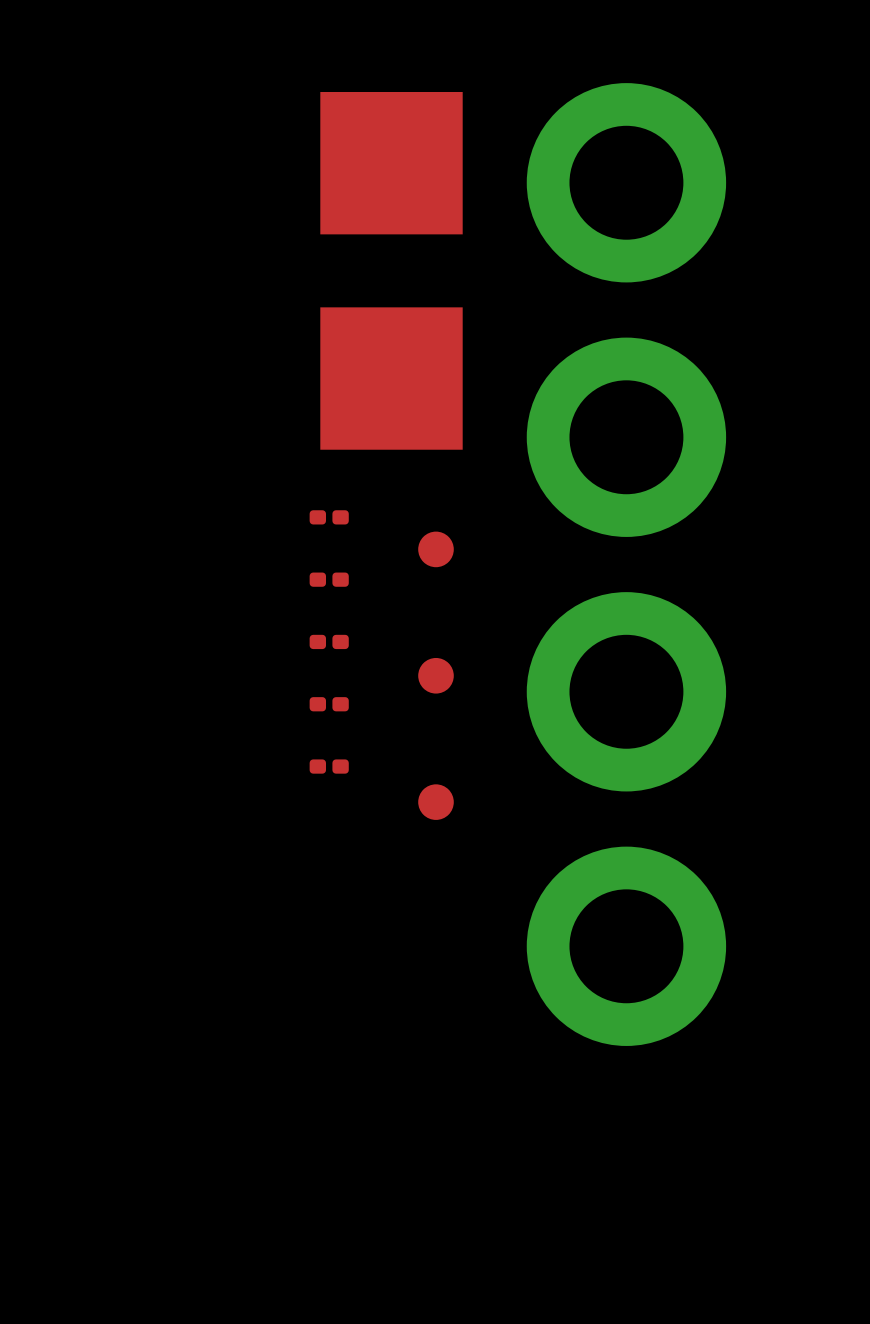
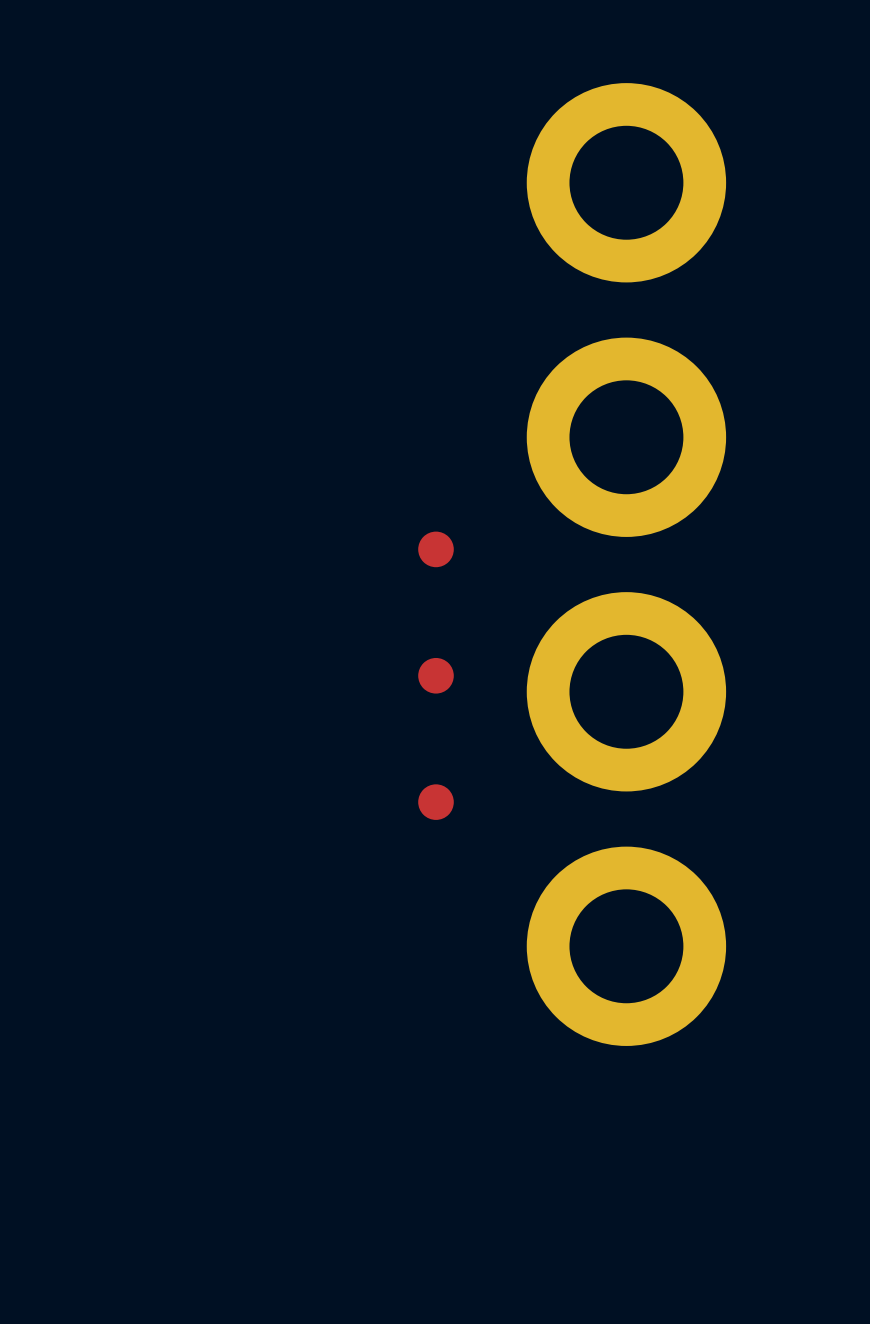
part: (391, 163) -> none
part: (391, 378) -> none
part: (329, 517) -> none
part: (329, 579) -> none
part: (329, 641) -> none
part: (329, 704) -> none
part: (329, 766) -> none

